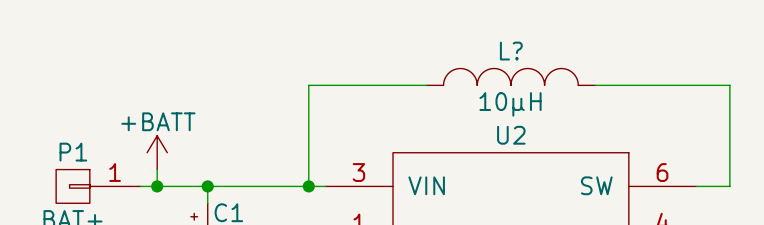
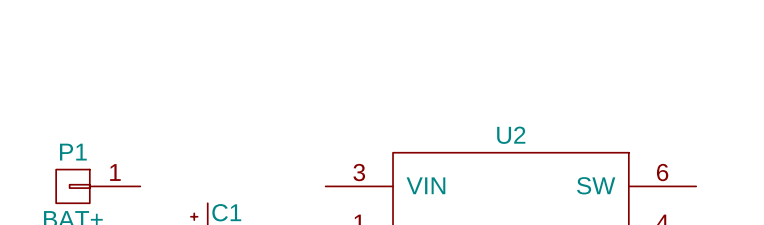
L?: 10µH (510, 76) -> none
wire: (426, 85) (308, 85) (308, 186) -> none
wire: (595, 85) (729, 85) (729, 186) (696, 186) -> none
power symbol: +BATT (157, 152) -> none
wire: (157, 169) (157, 186) -> none
wire: (140, 186) (325, 186) -> none
junction: (157, 186) -> none
wire: (207, 186) (207, 203) -> none
junction: (207, 186) -> none
junction: (308, 186) -> none

